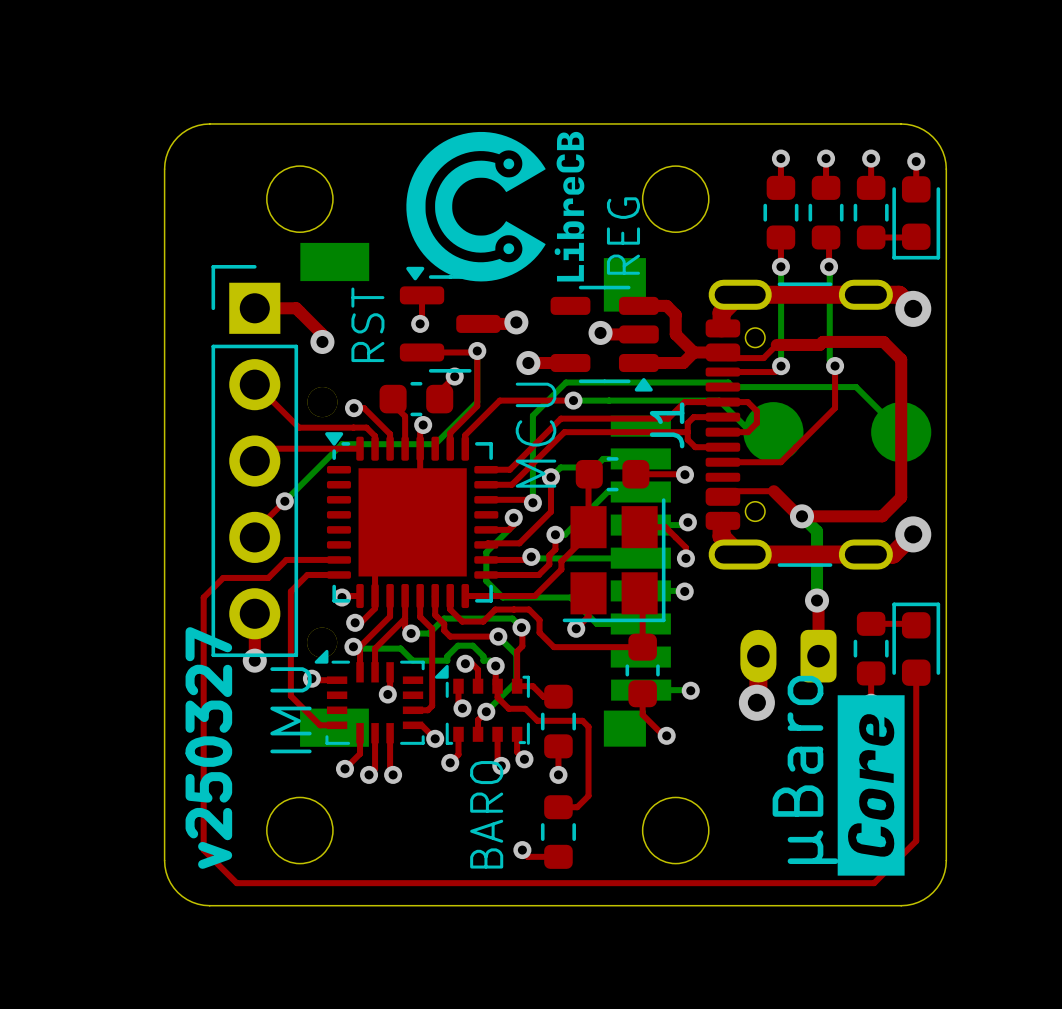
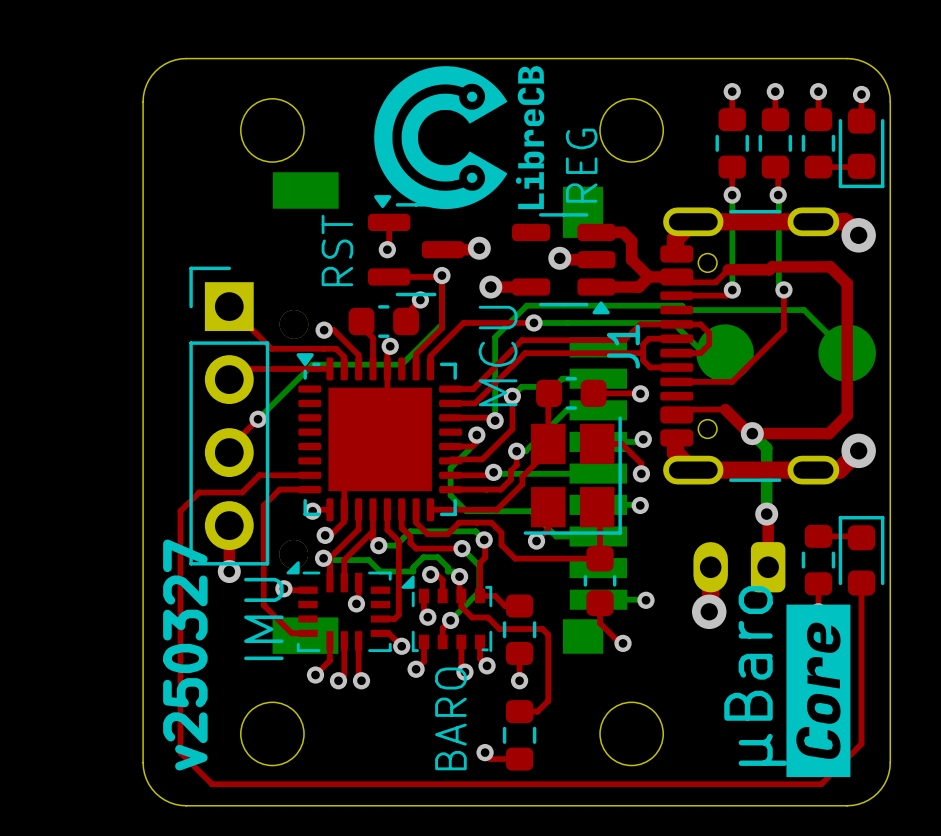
top track: (254, 308) (296, 308) (322, 334) (322, 341) -> none
via: (322, 341) -> none
part: (254, 461) -> none
part: none -> (229, 416)

